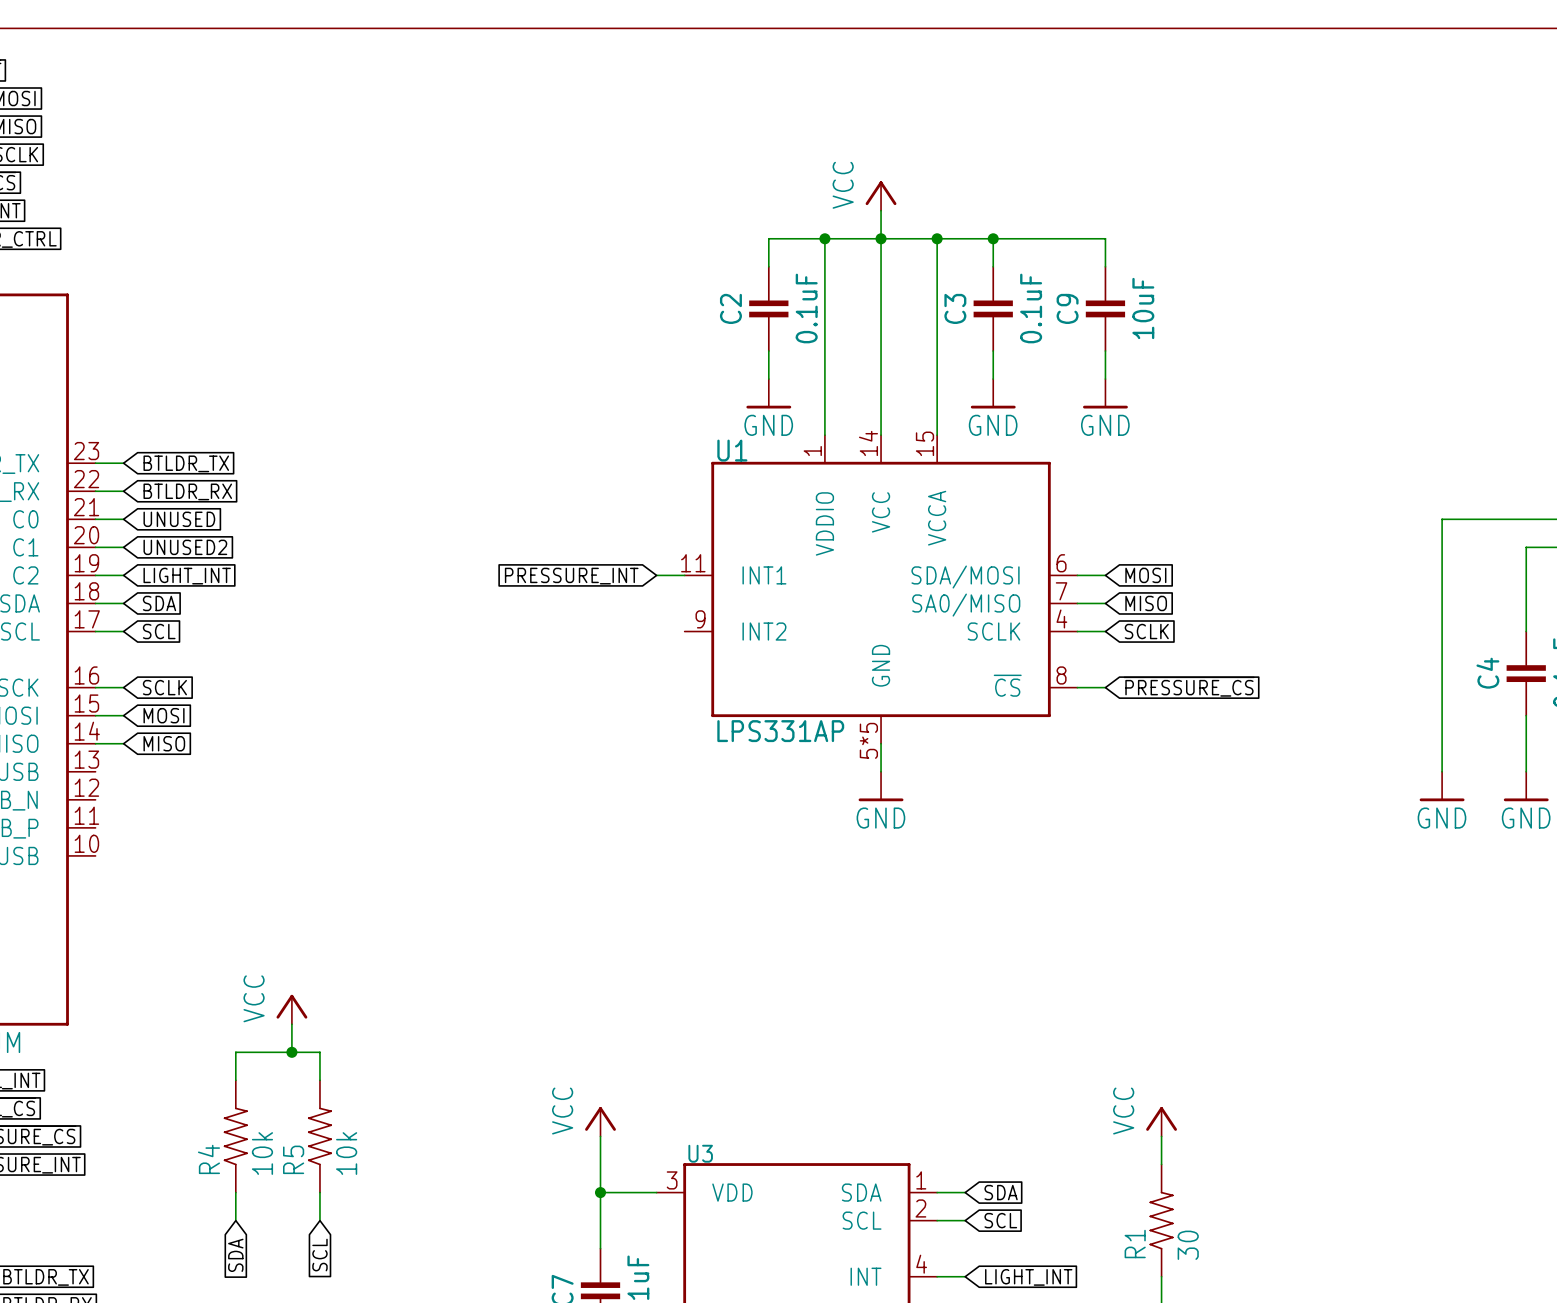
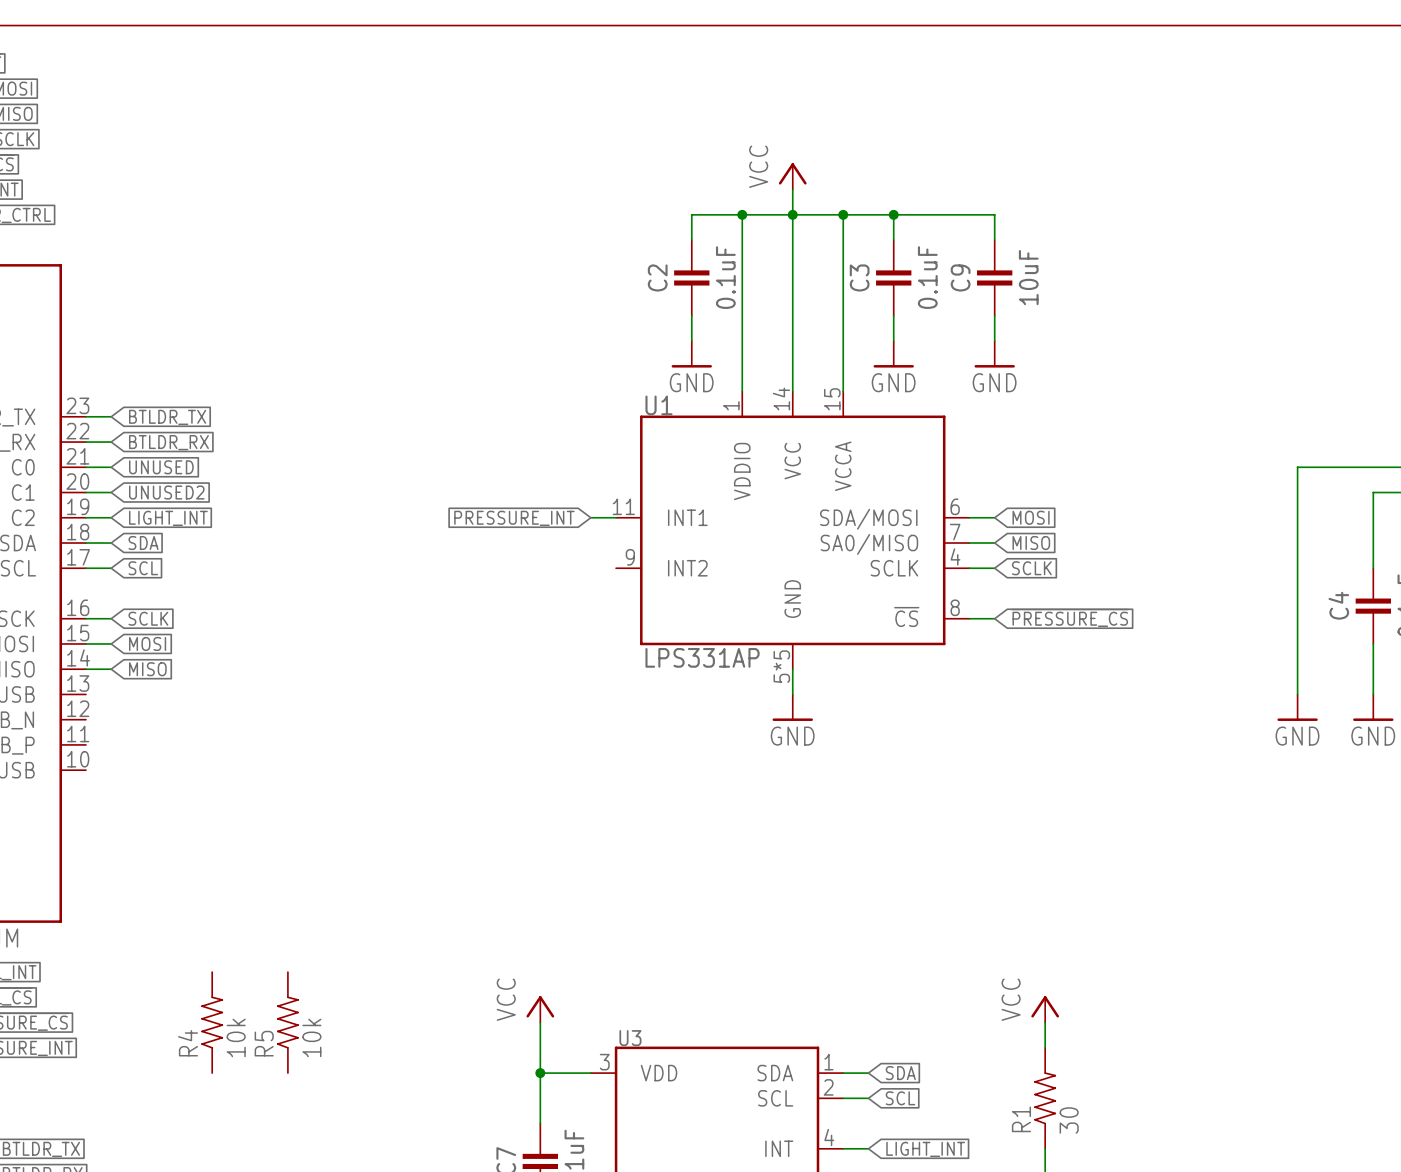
power symbol: VCC (291, 1009) -> none
wire: (291, 1024) (291, 1052) -> none
junction: (291, 1052) -> none
wire: (235, 1080) (235, 1052) (319, 1052) (319, 1080) -> none
wire: (235, 1192) (235, 1220) -> none
wire: (319, 1192) (319, 1220) -> none
global label: SDA (235, 1255) -> none
global label: SCL (319, 1255) -> none

